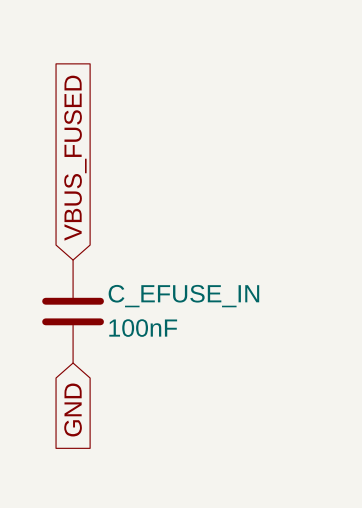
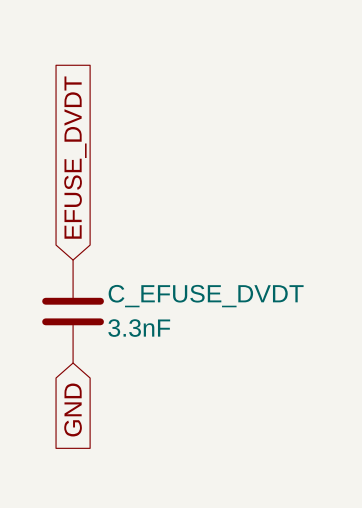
global label: VBUS_FUSED (75, 158) -> EFUSE_DVDT (75, 157)
C_EFUSE_IN name: C_EFUSE_IN (183, 296) -> C_EFUSE_DVDT (206, 296)
C_EFUSE_IN value: 100nF (143, 328) -> 3.3nF (139, 328)

